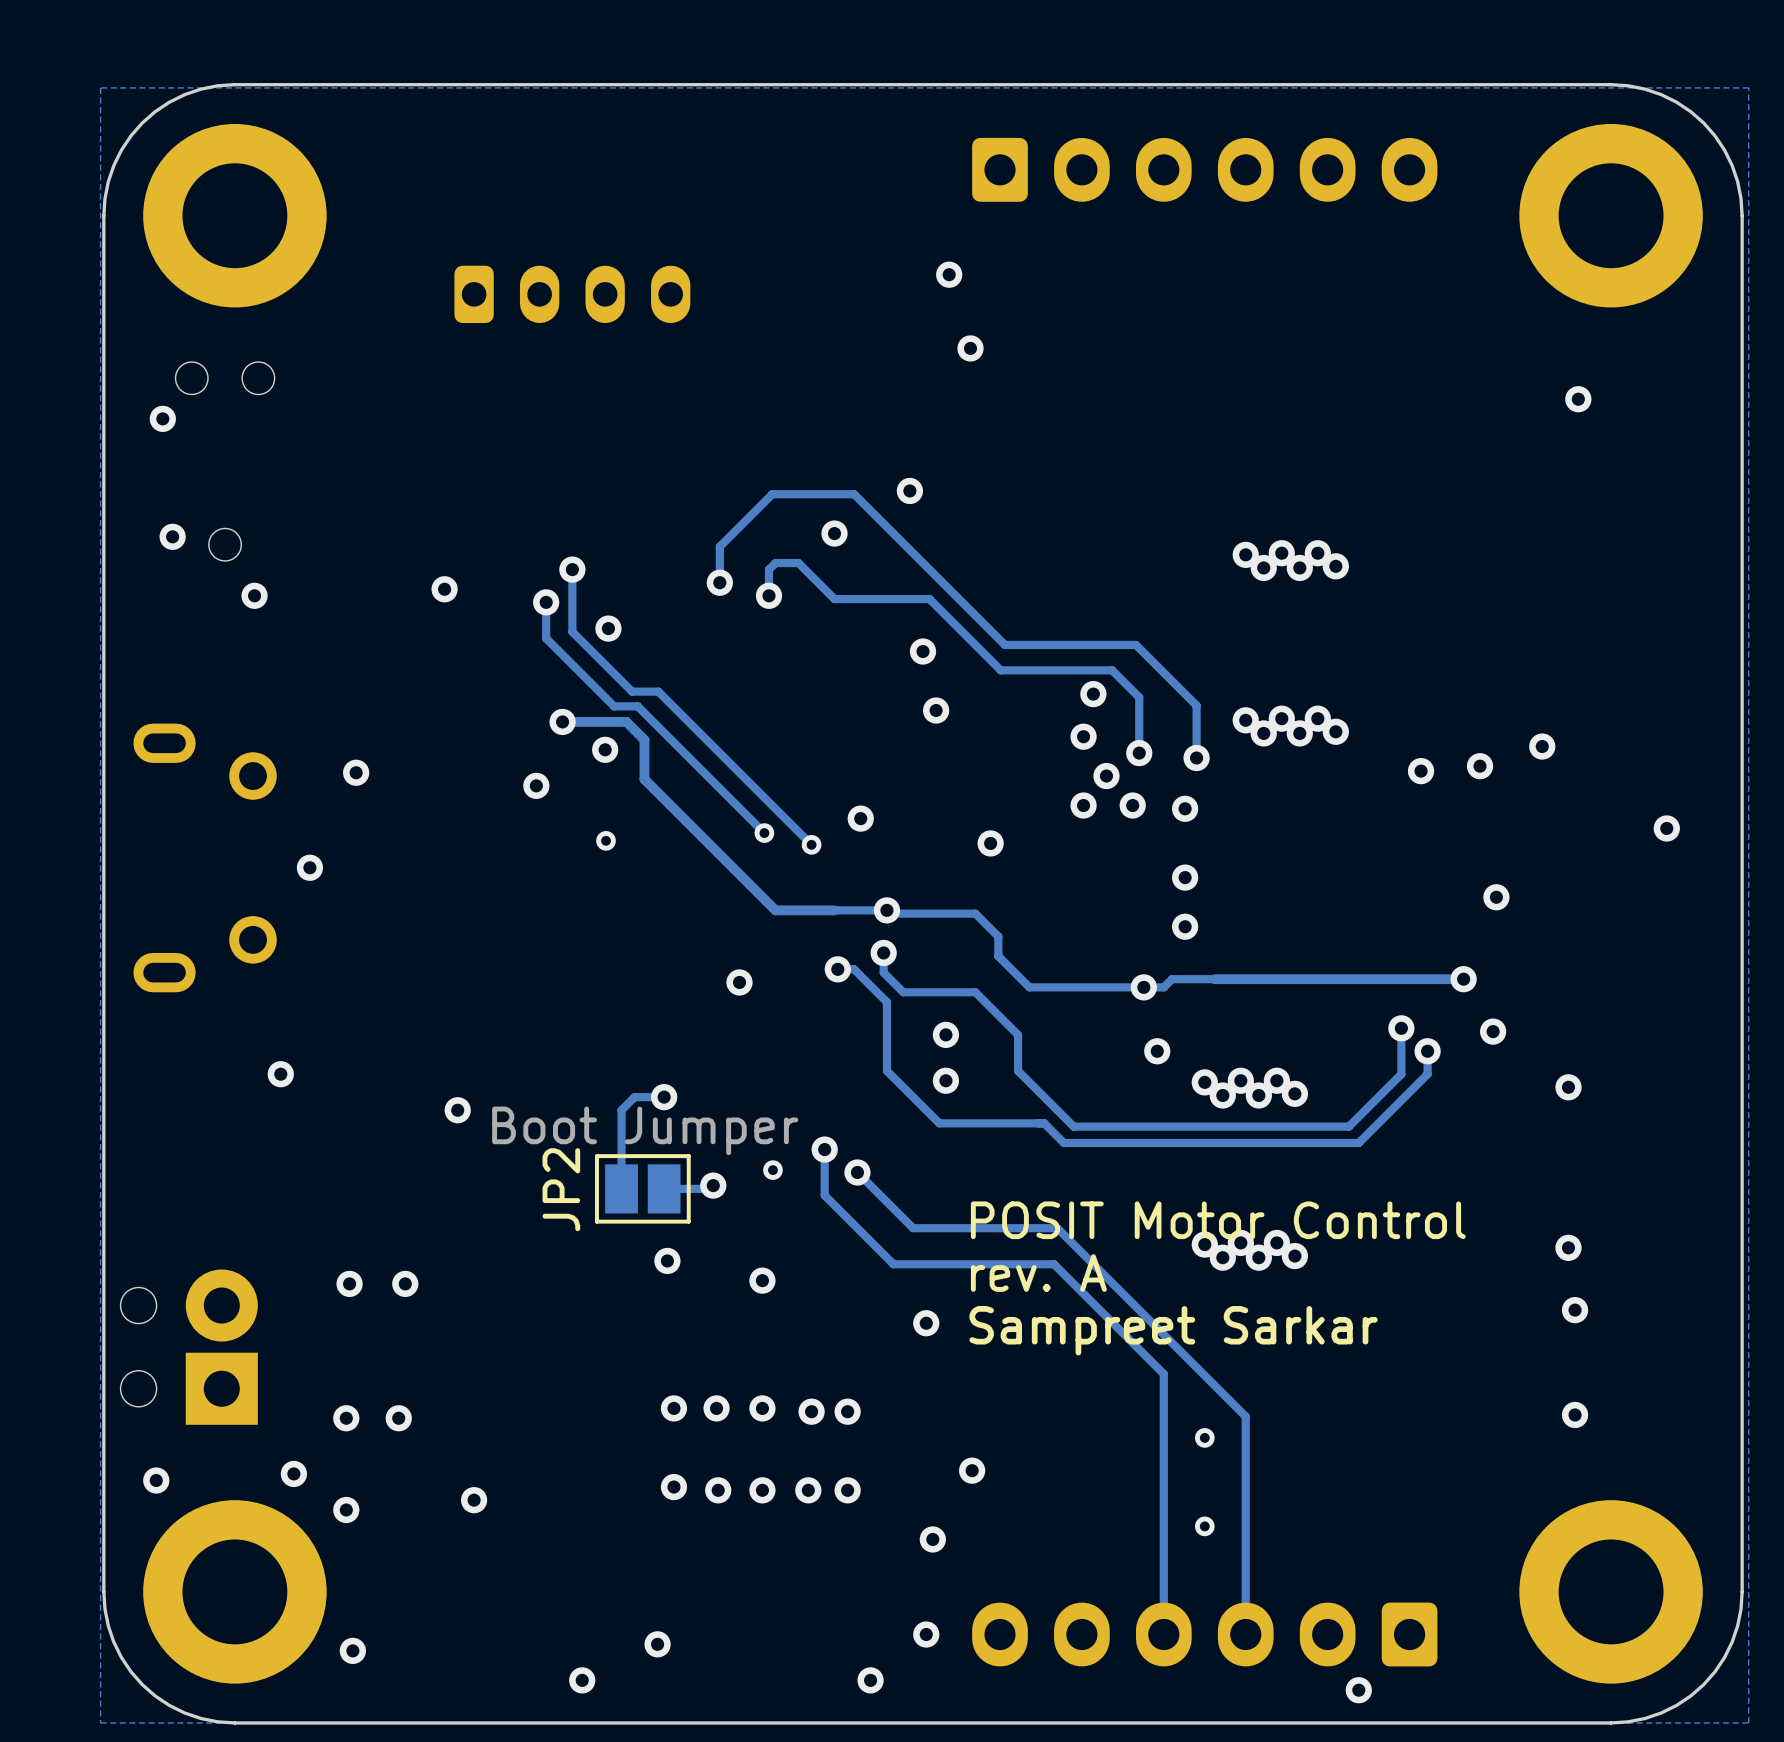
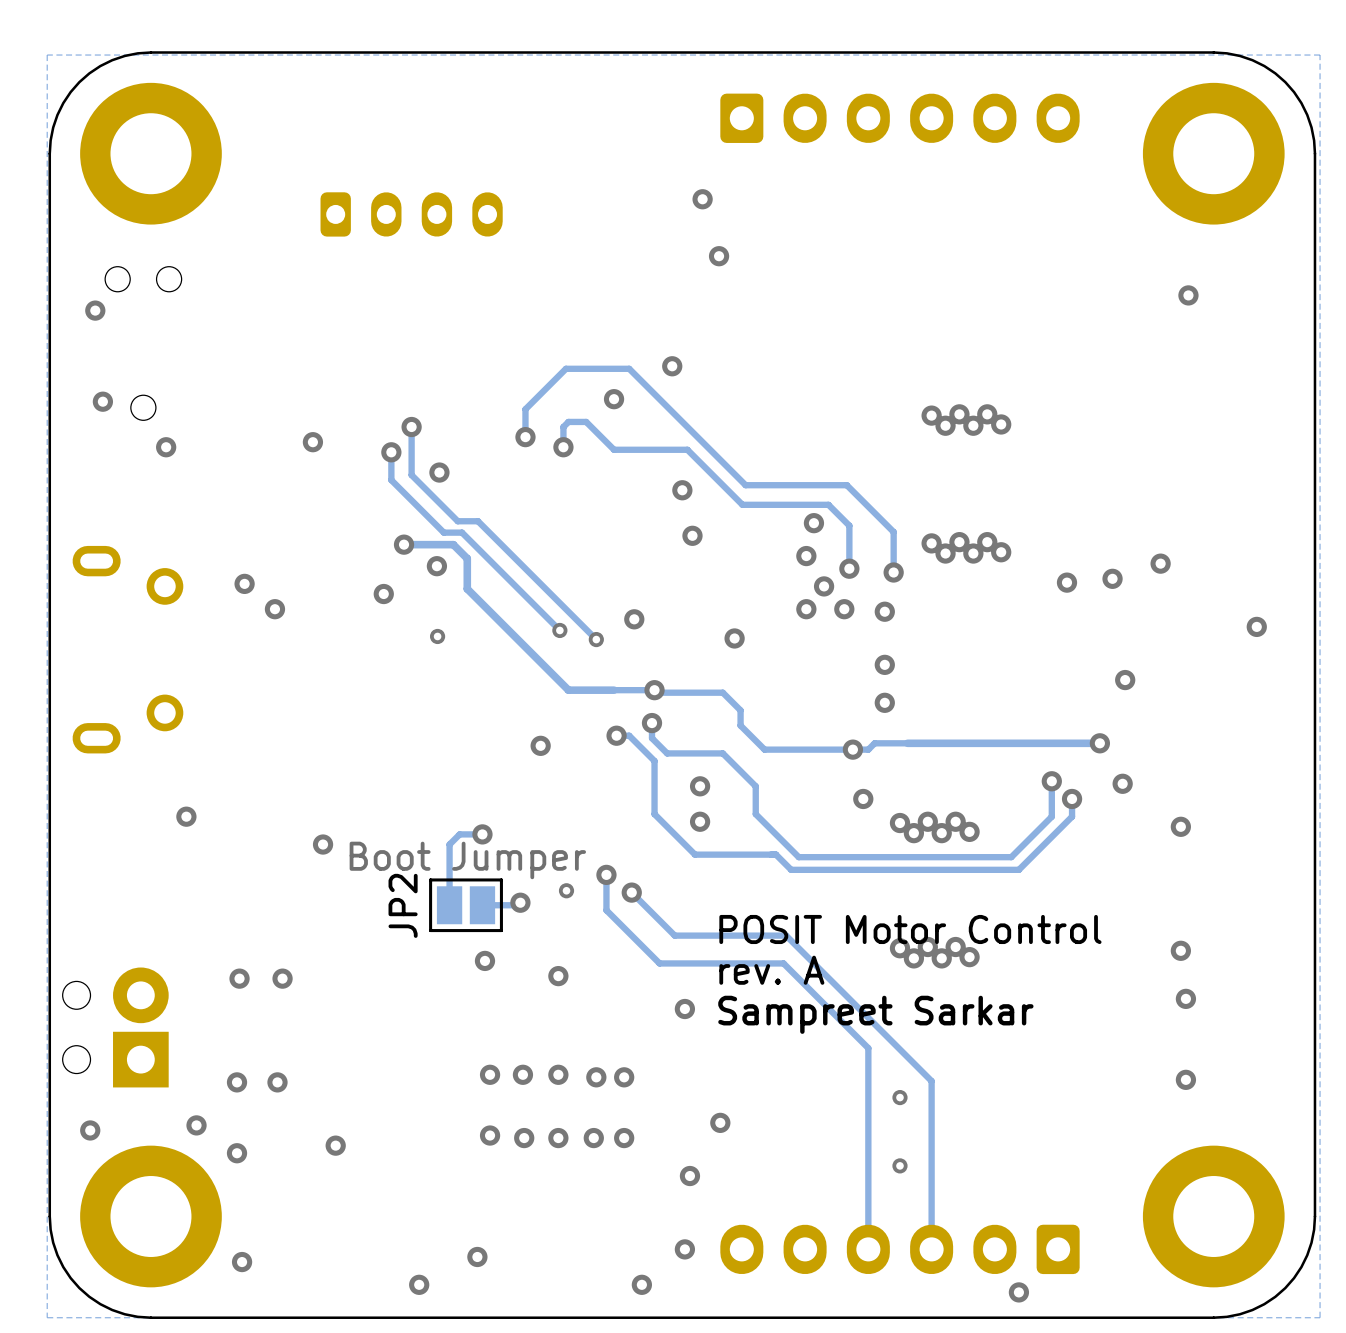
via position: (309, 867) -> (274, 609)

